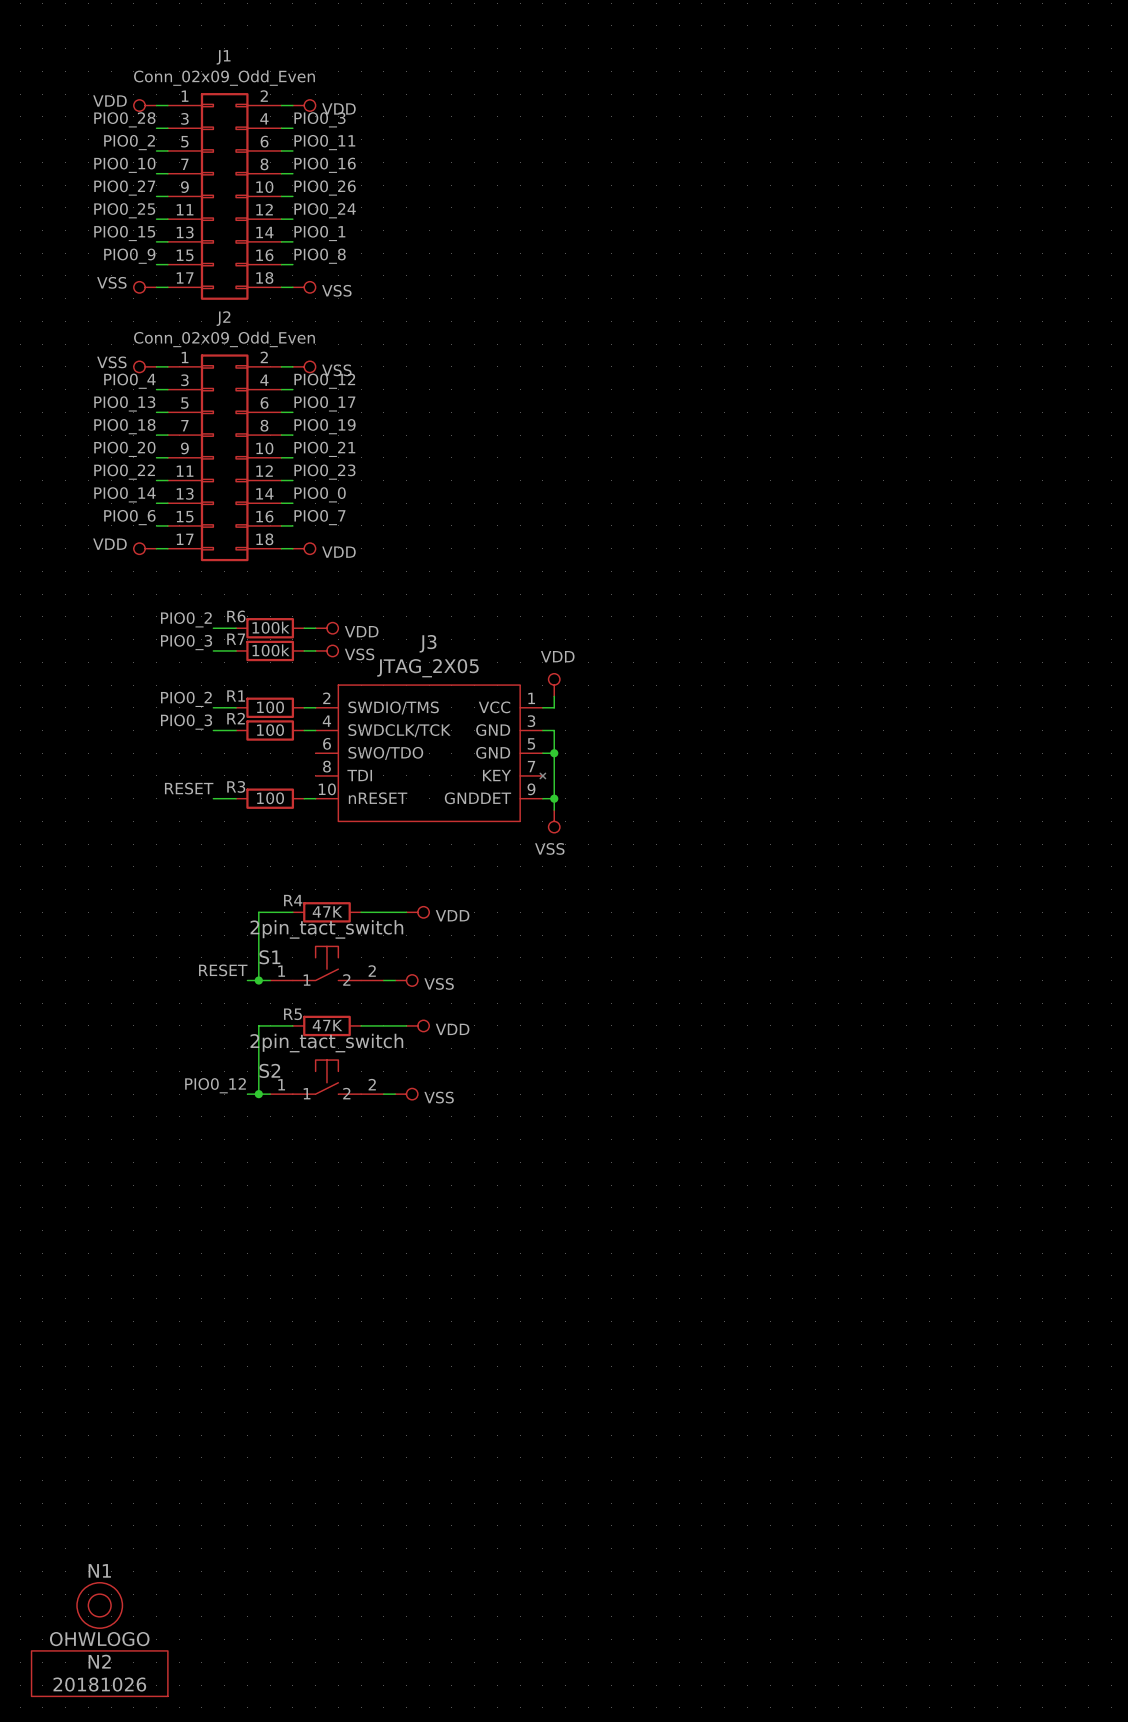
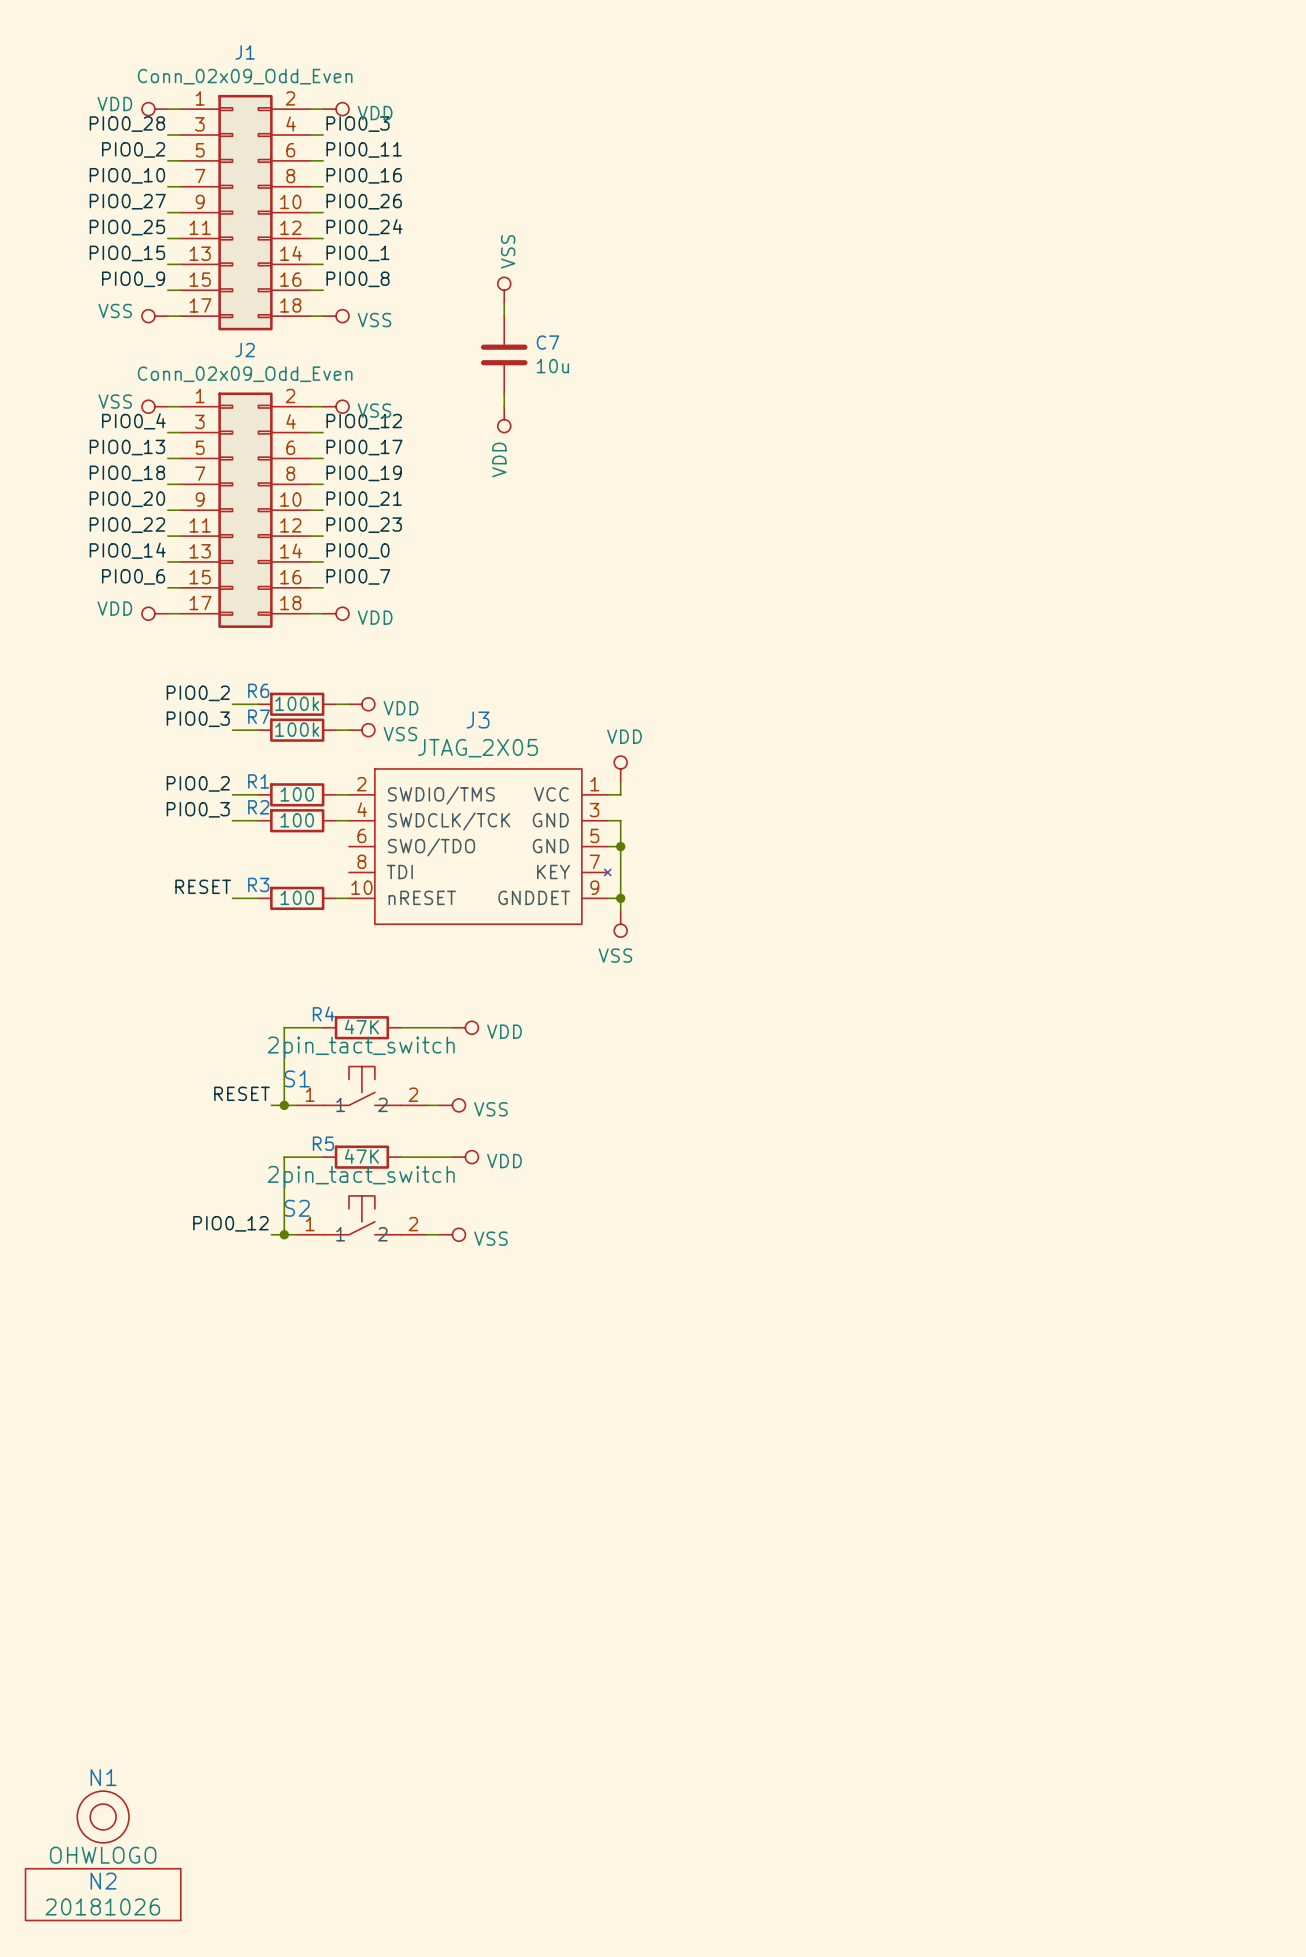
power symbol: none -> VSS (504, 290)
wire: none -> (504, 303) (504, 316)
C7: none -> 10u (504, 354)
wire: none -> (504, 393) (504, 406)
power symbol: none -> VDD (504, 419)

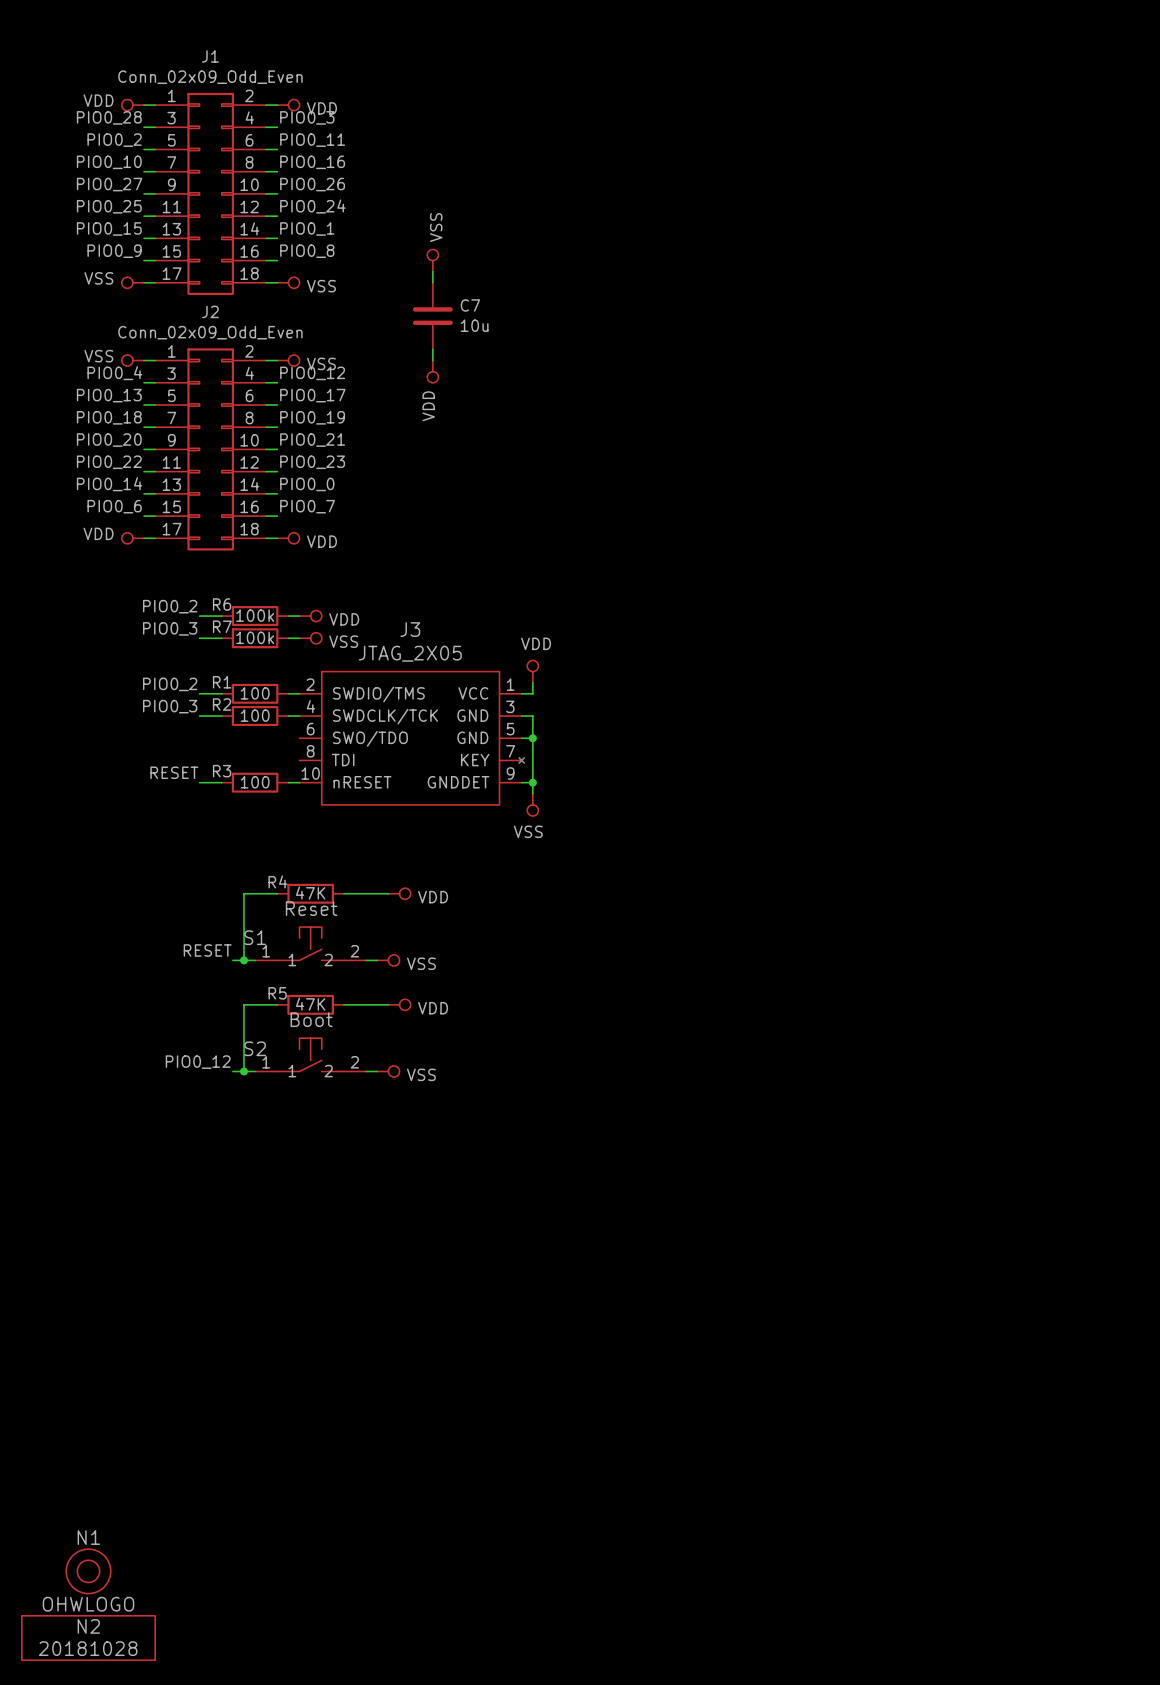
S1 value: 2pin_tact_switch (361, 1047) -> Reset (311, 908)
S2 value: 2pin_tact_switch (361, 1176) -> Boot (311, 1019)
N2 value: 20181026 (102, 1906) -> 20181028 (88, 1648)

